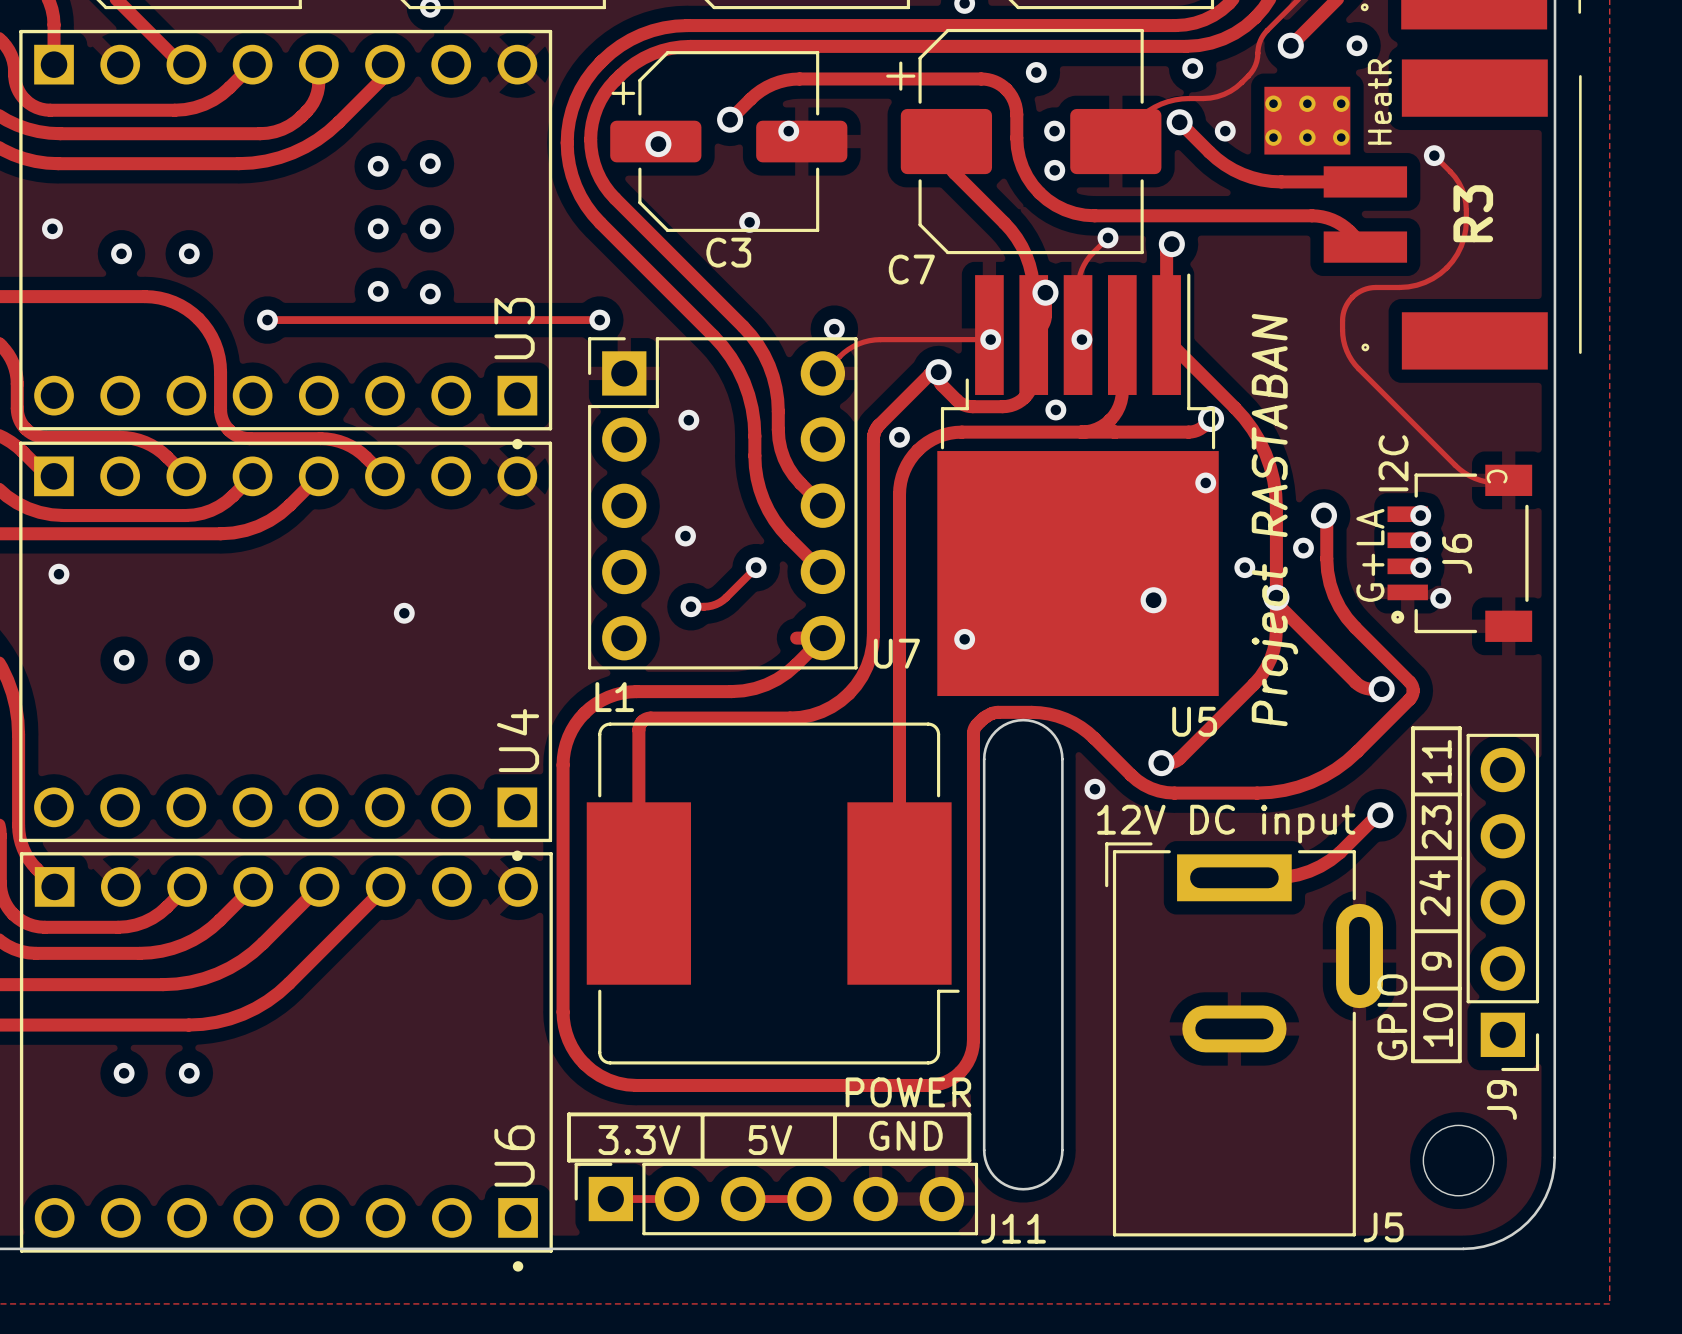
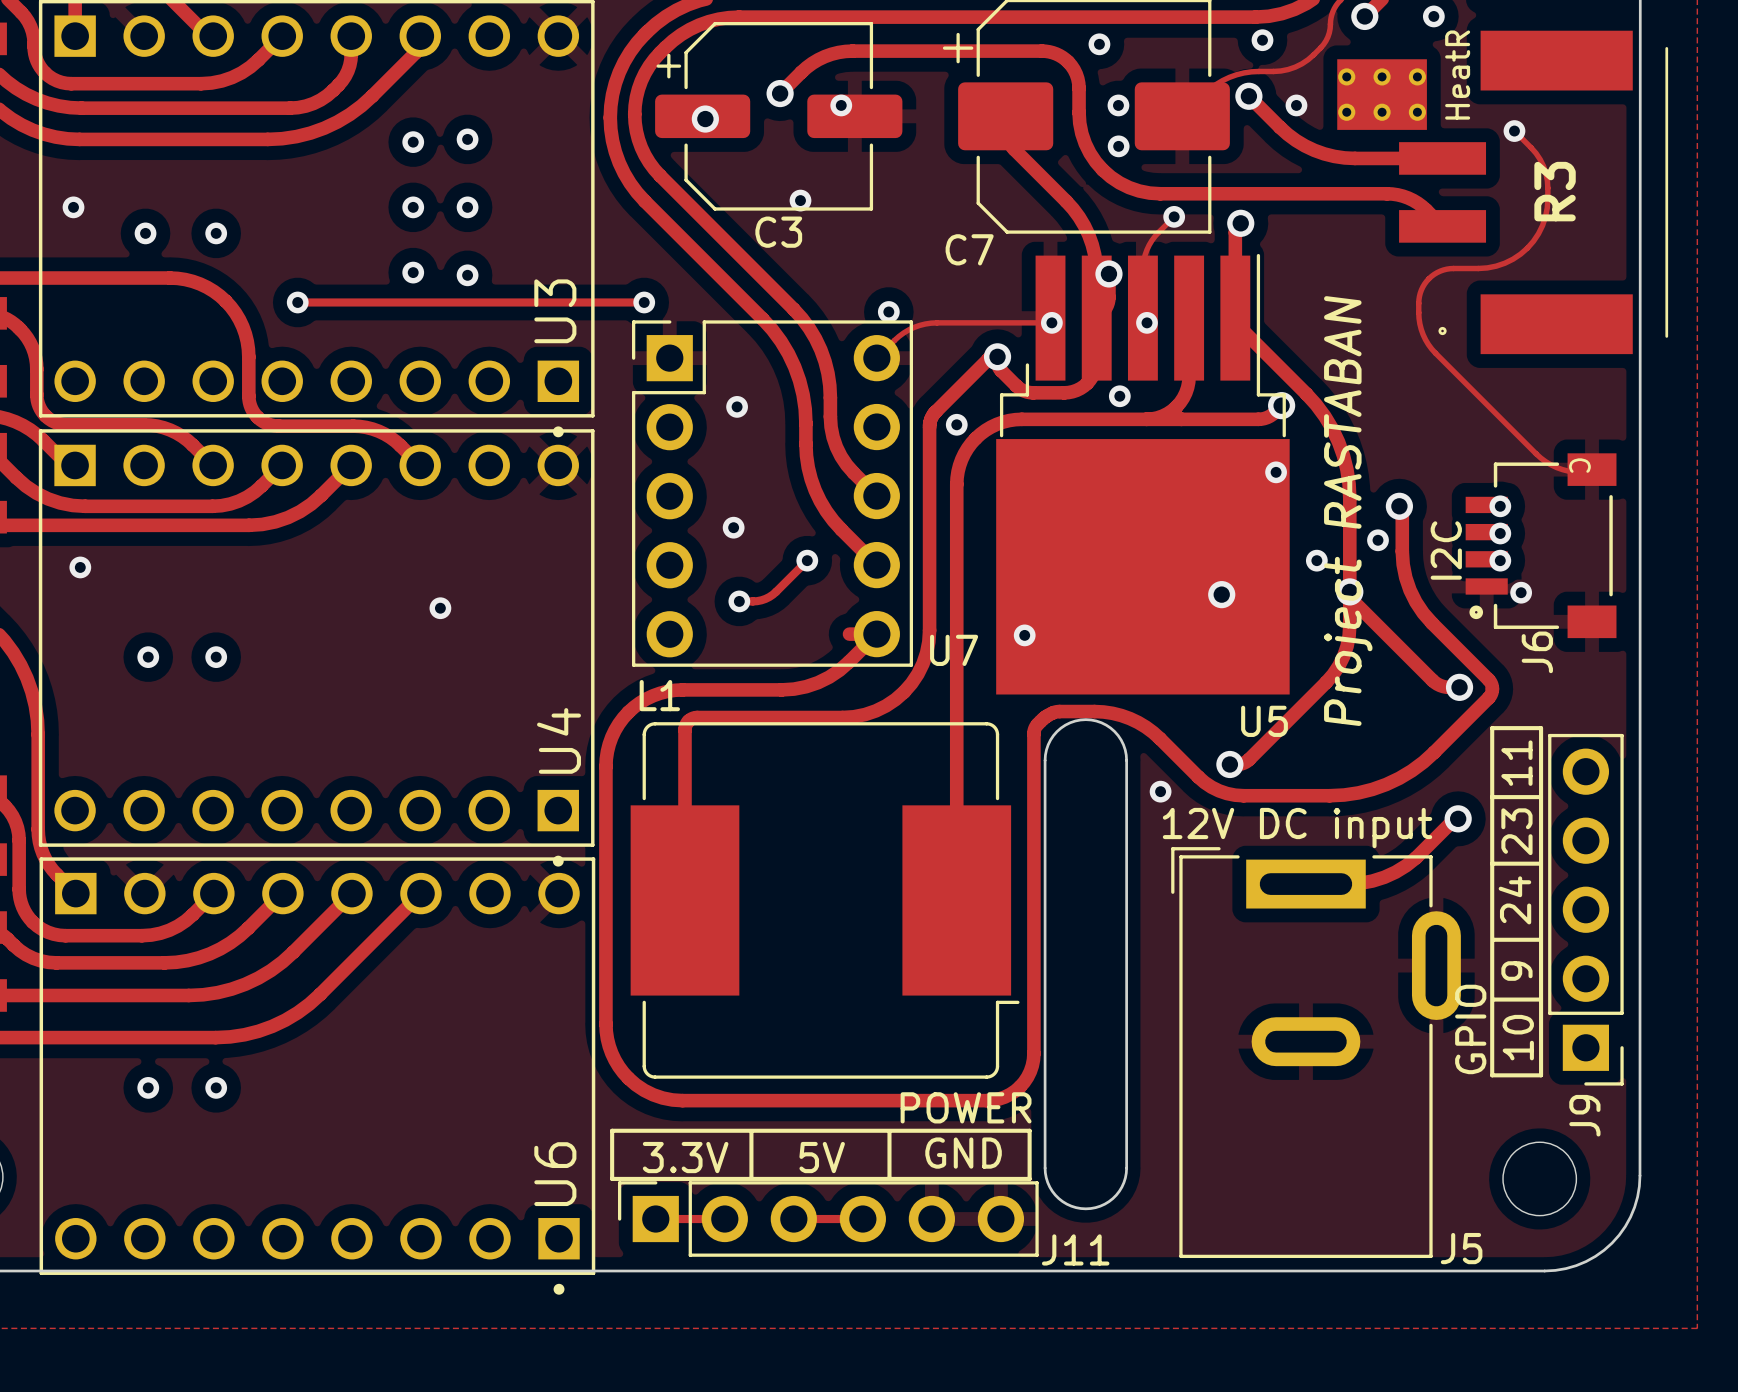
text: I2C (1393, 463) -> none
J6 name position: J6 (1457, 553) -> J6 (1537, 652)
text: G+LA (1370, 555) -> I2C (1446, 550)

